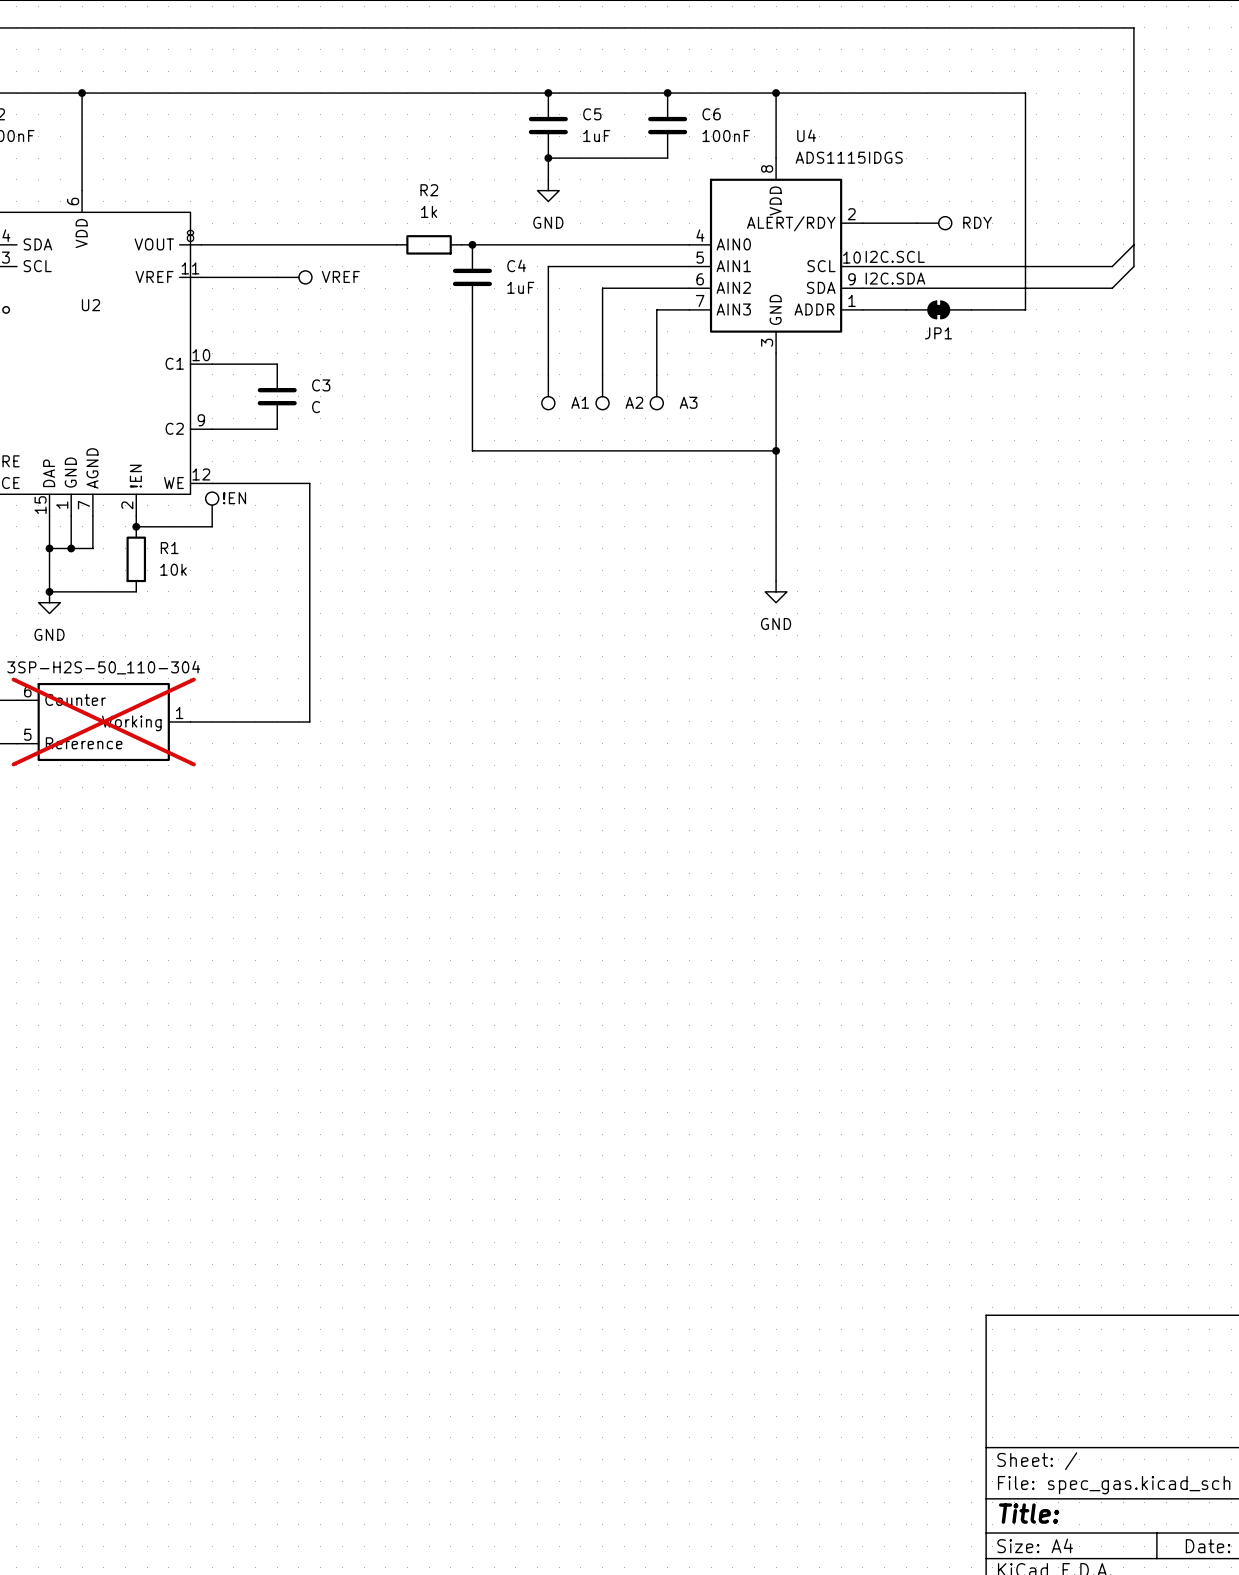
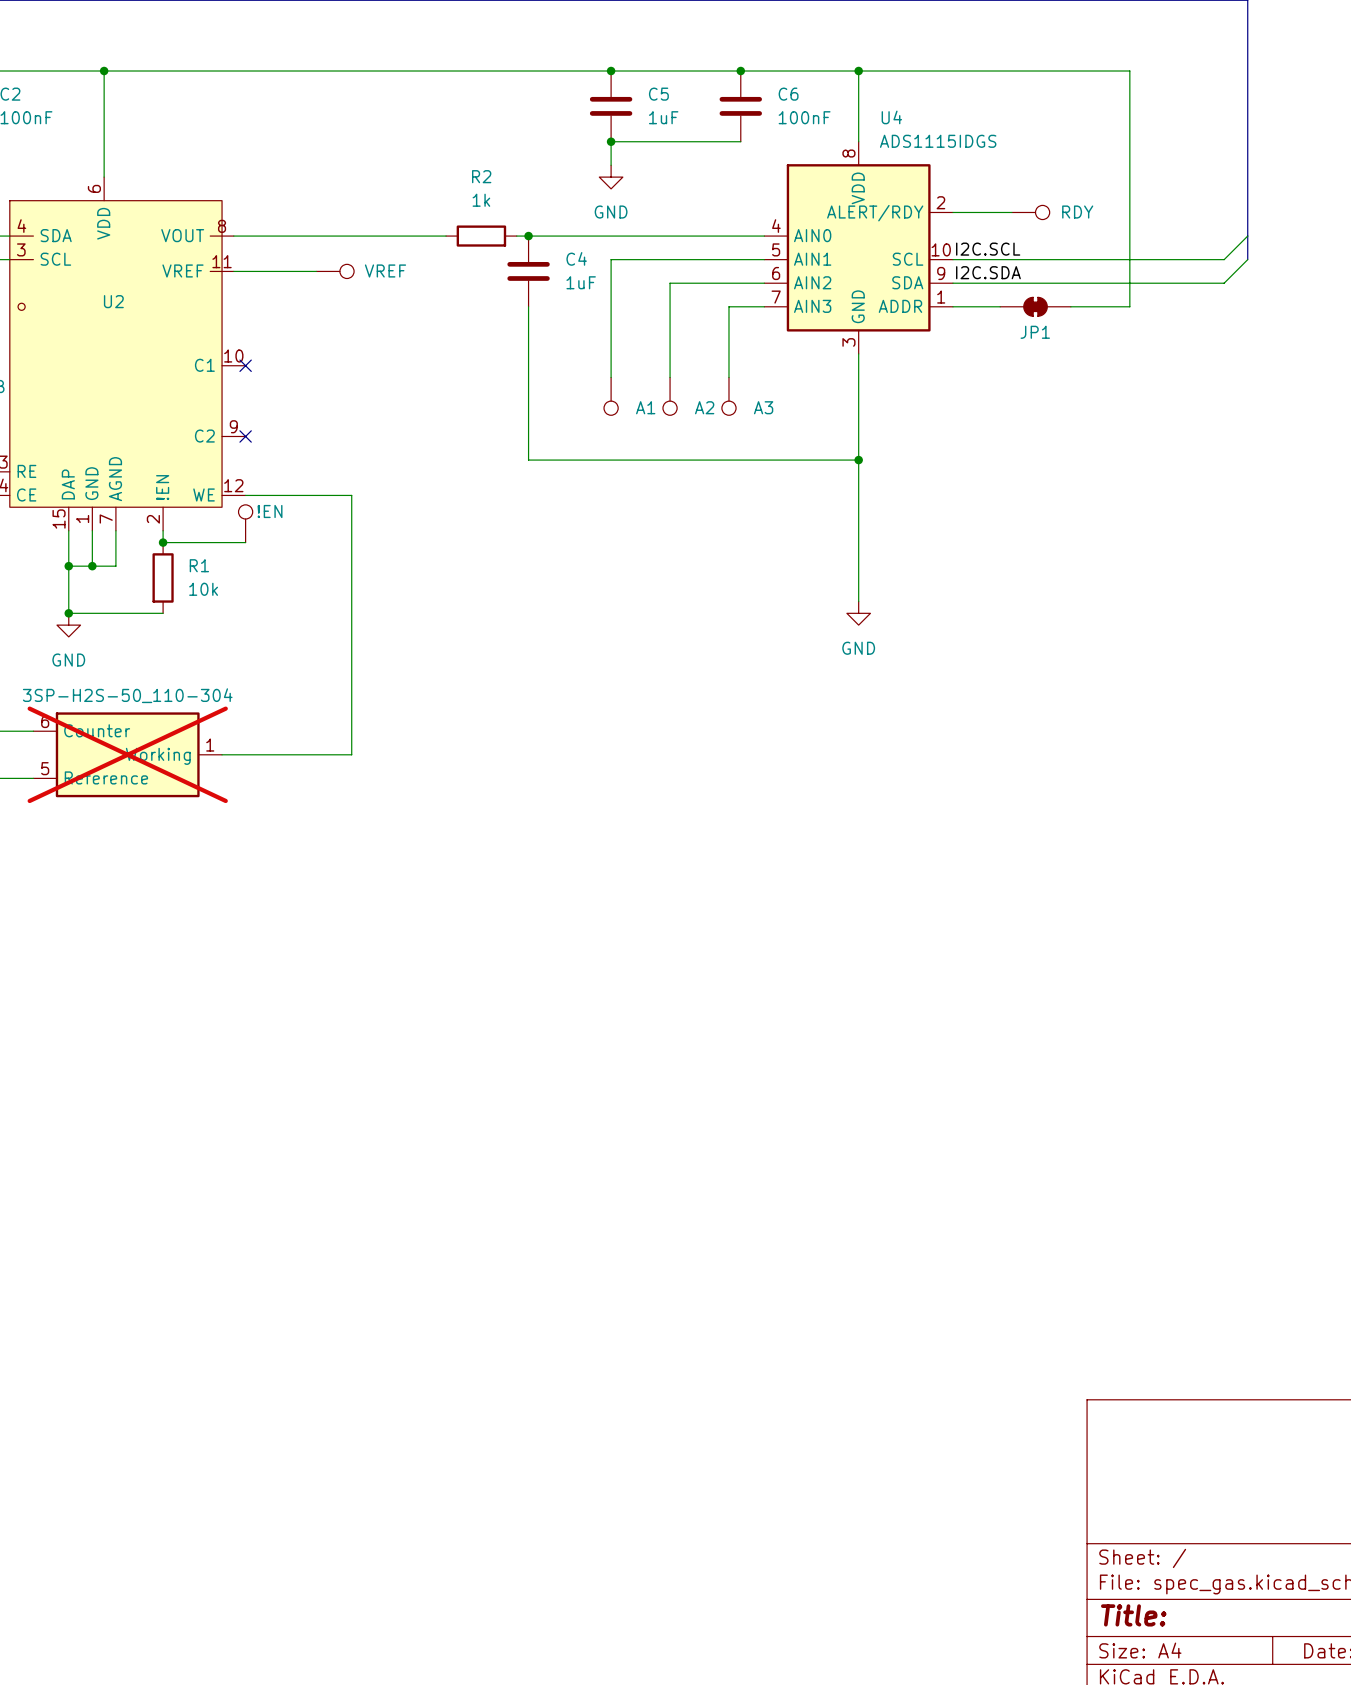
wire: (212, 364) (277, 364) -> none
no-connect mark: none -> (245, 365)
C3: C (277, 396) -> none
wire: (212, 429) (277, 429) -> none
no-connect mark: none -> (245, 436)

